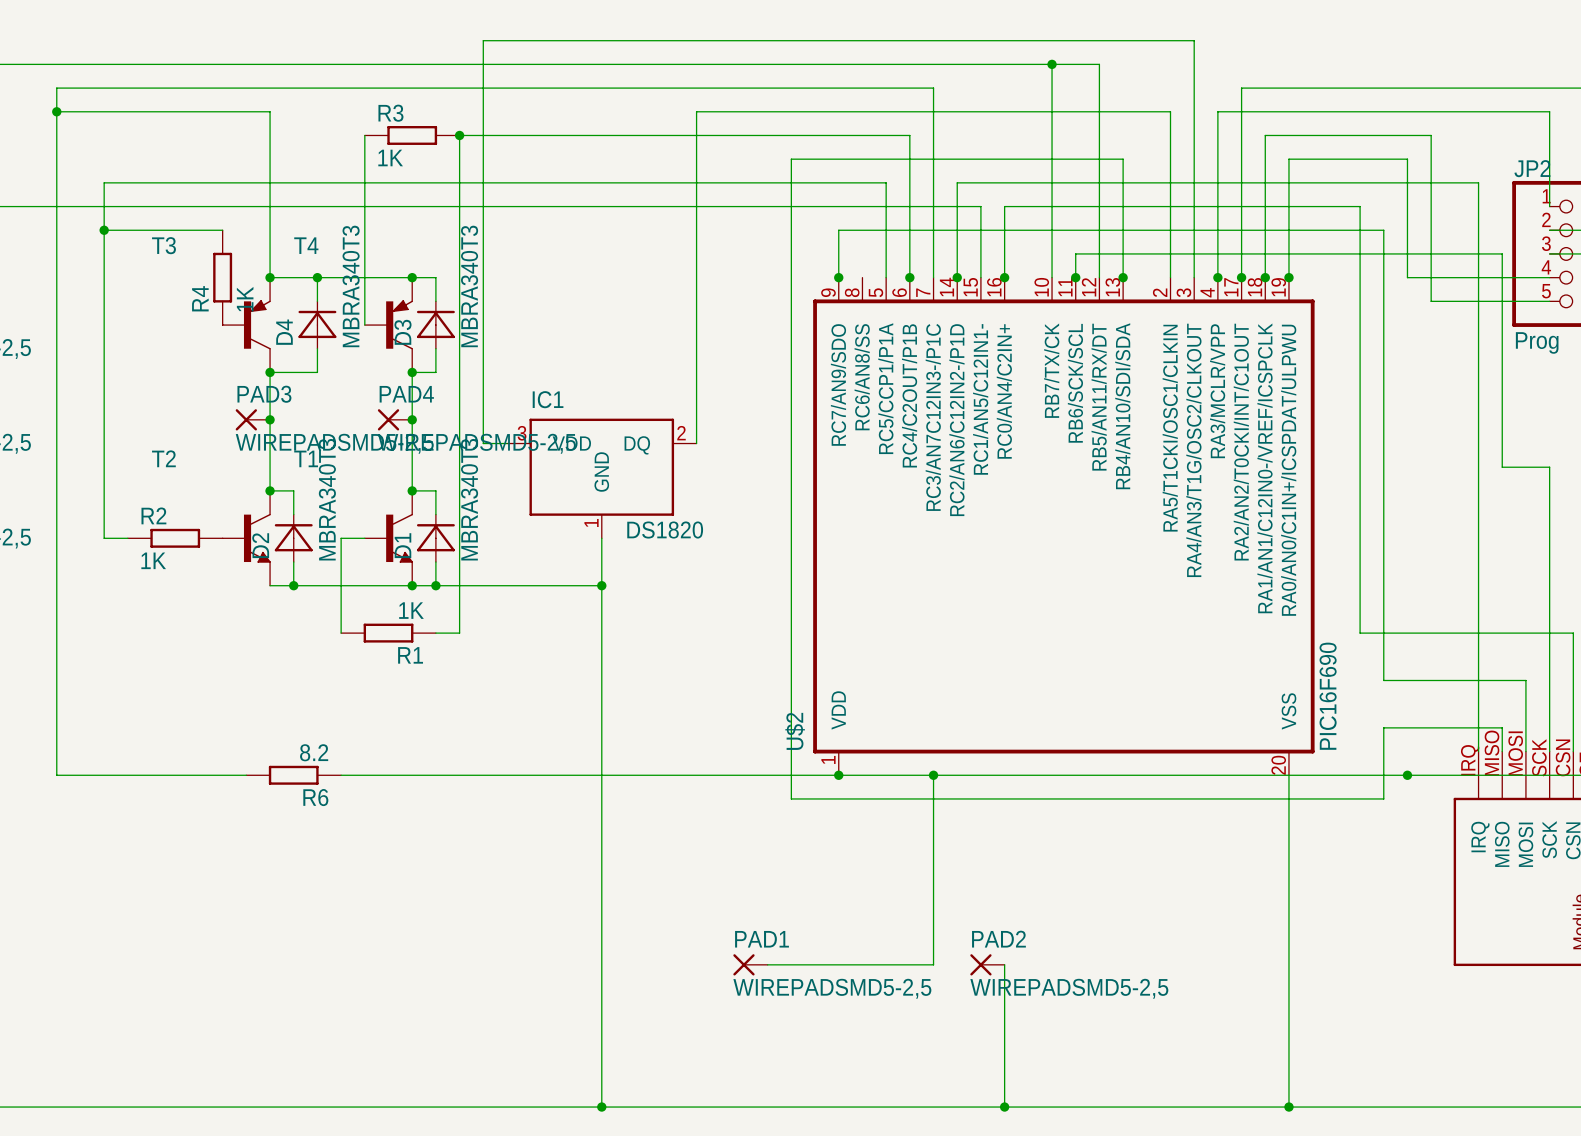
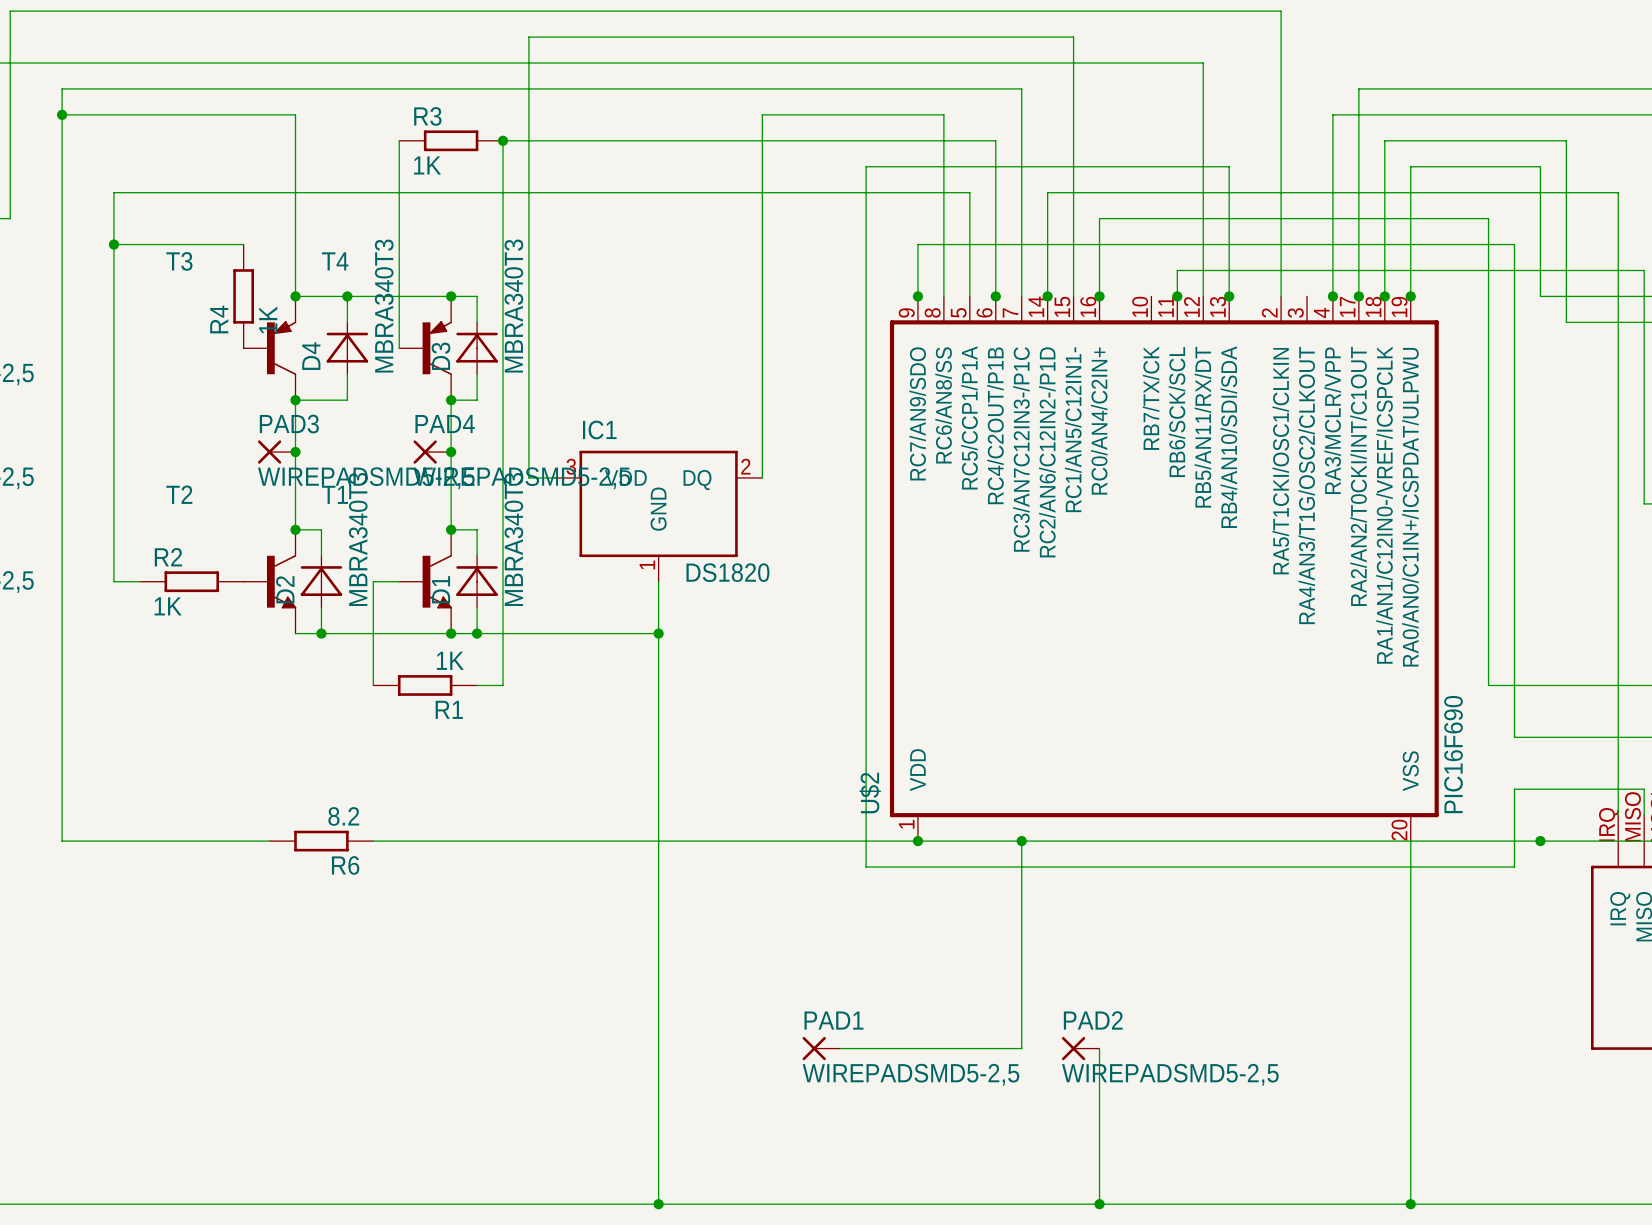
wire: (980, 40) (1194, 40) (1194, 277) -> (1073, 37) (1073, 218)
wire: (1052, 64) (1052, 277) -> none
junction: (1052, 64) -> none
wire: (862, 111) (1170, 111) -> (943, 114) (943, 296)
wire: (9, 206) (980, 206) -> (10, 218) (10, 11) (1281, 11) (1281, 114)

